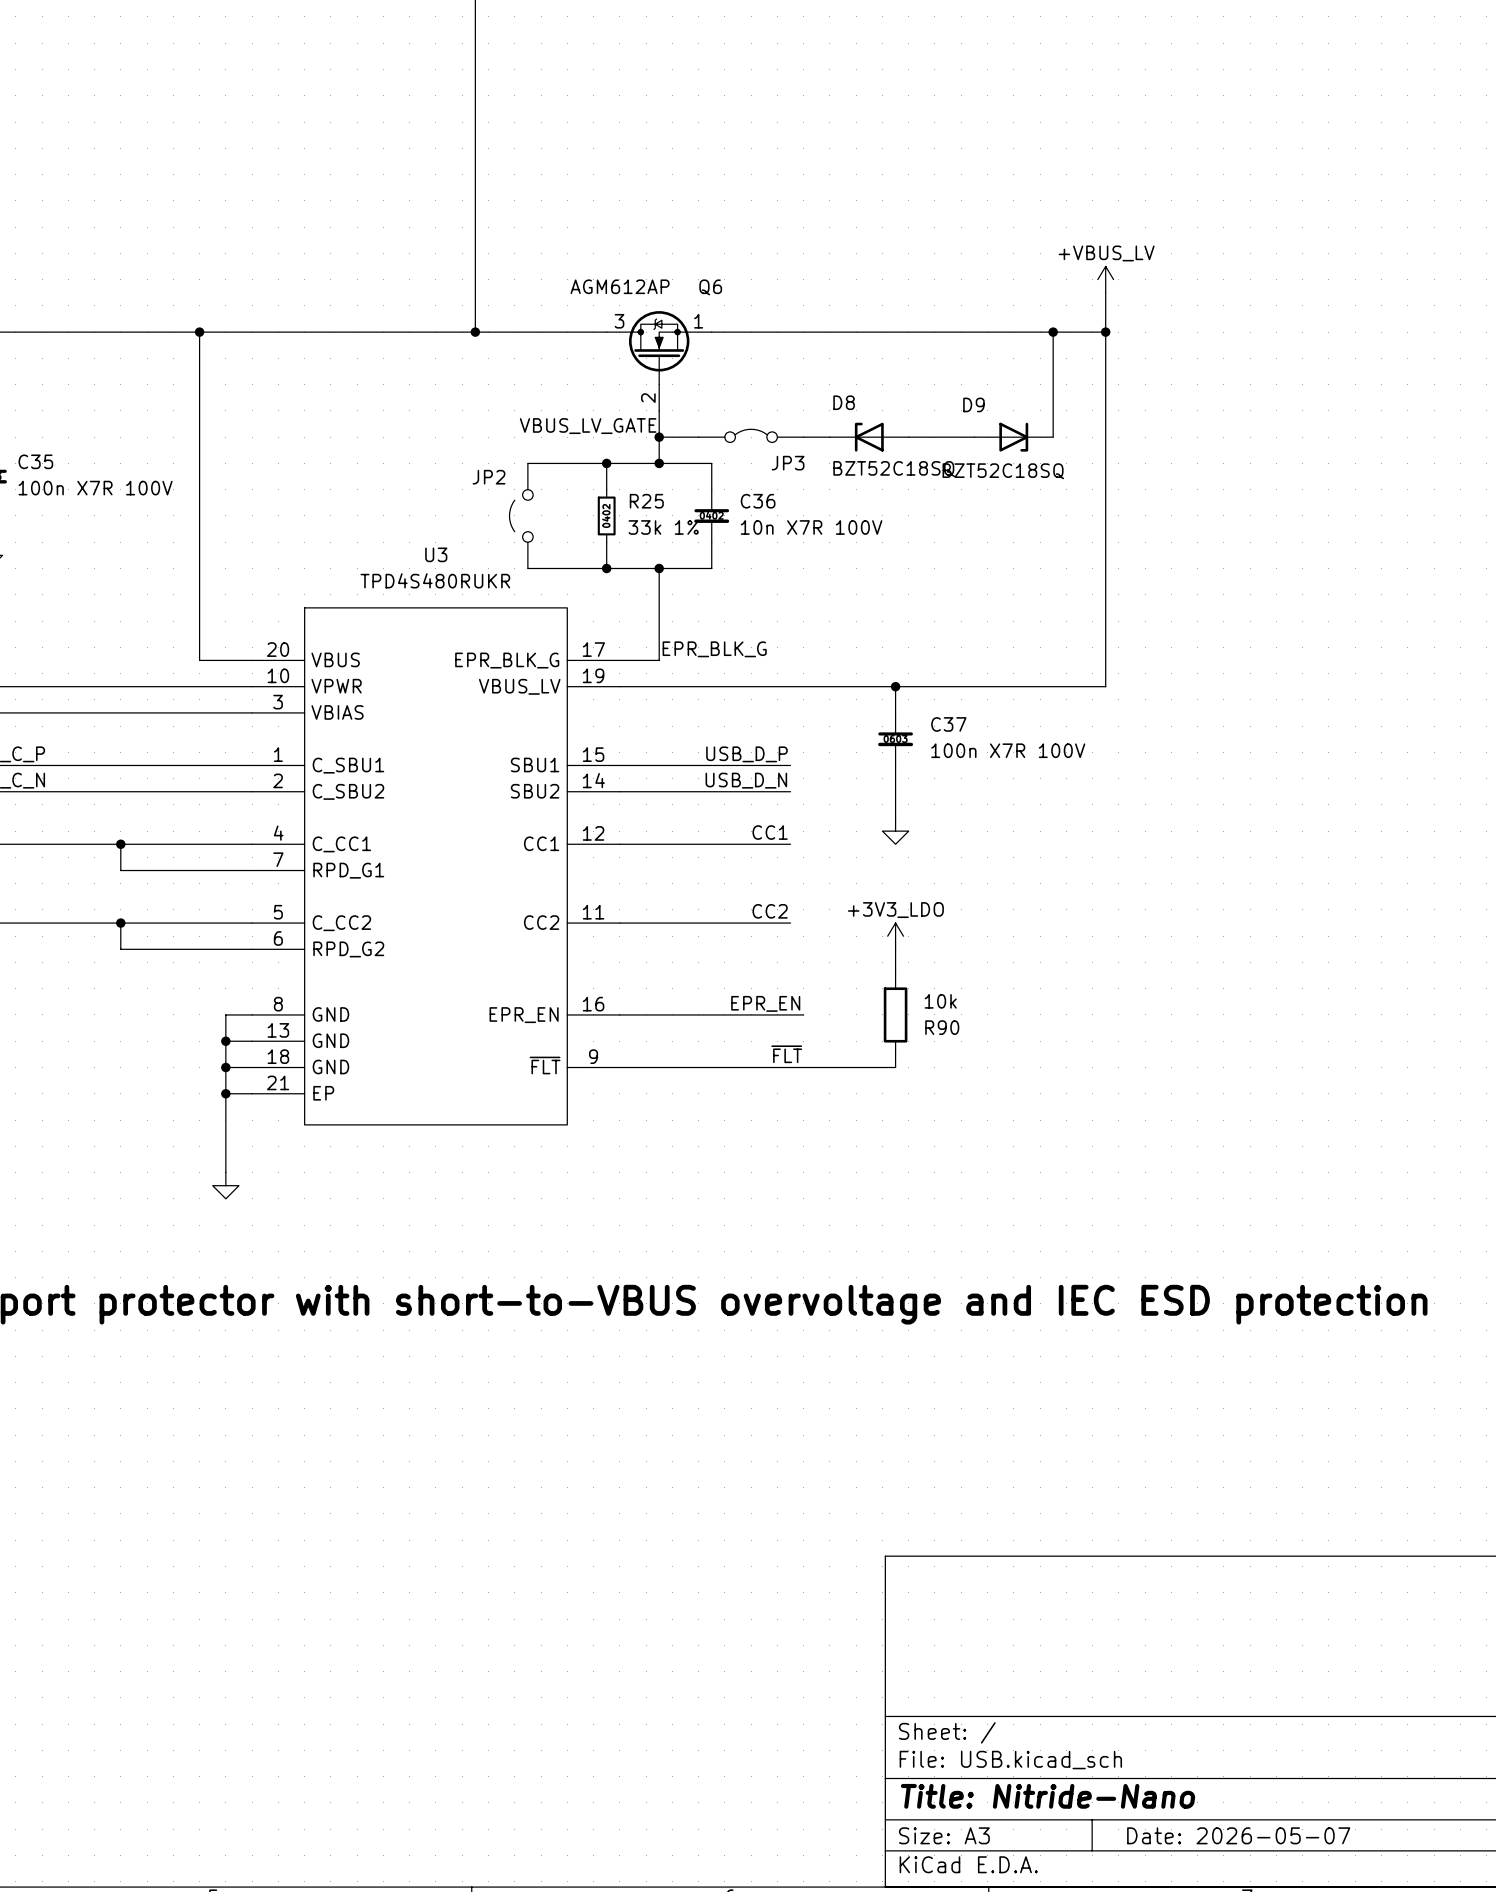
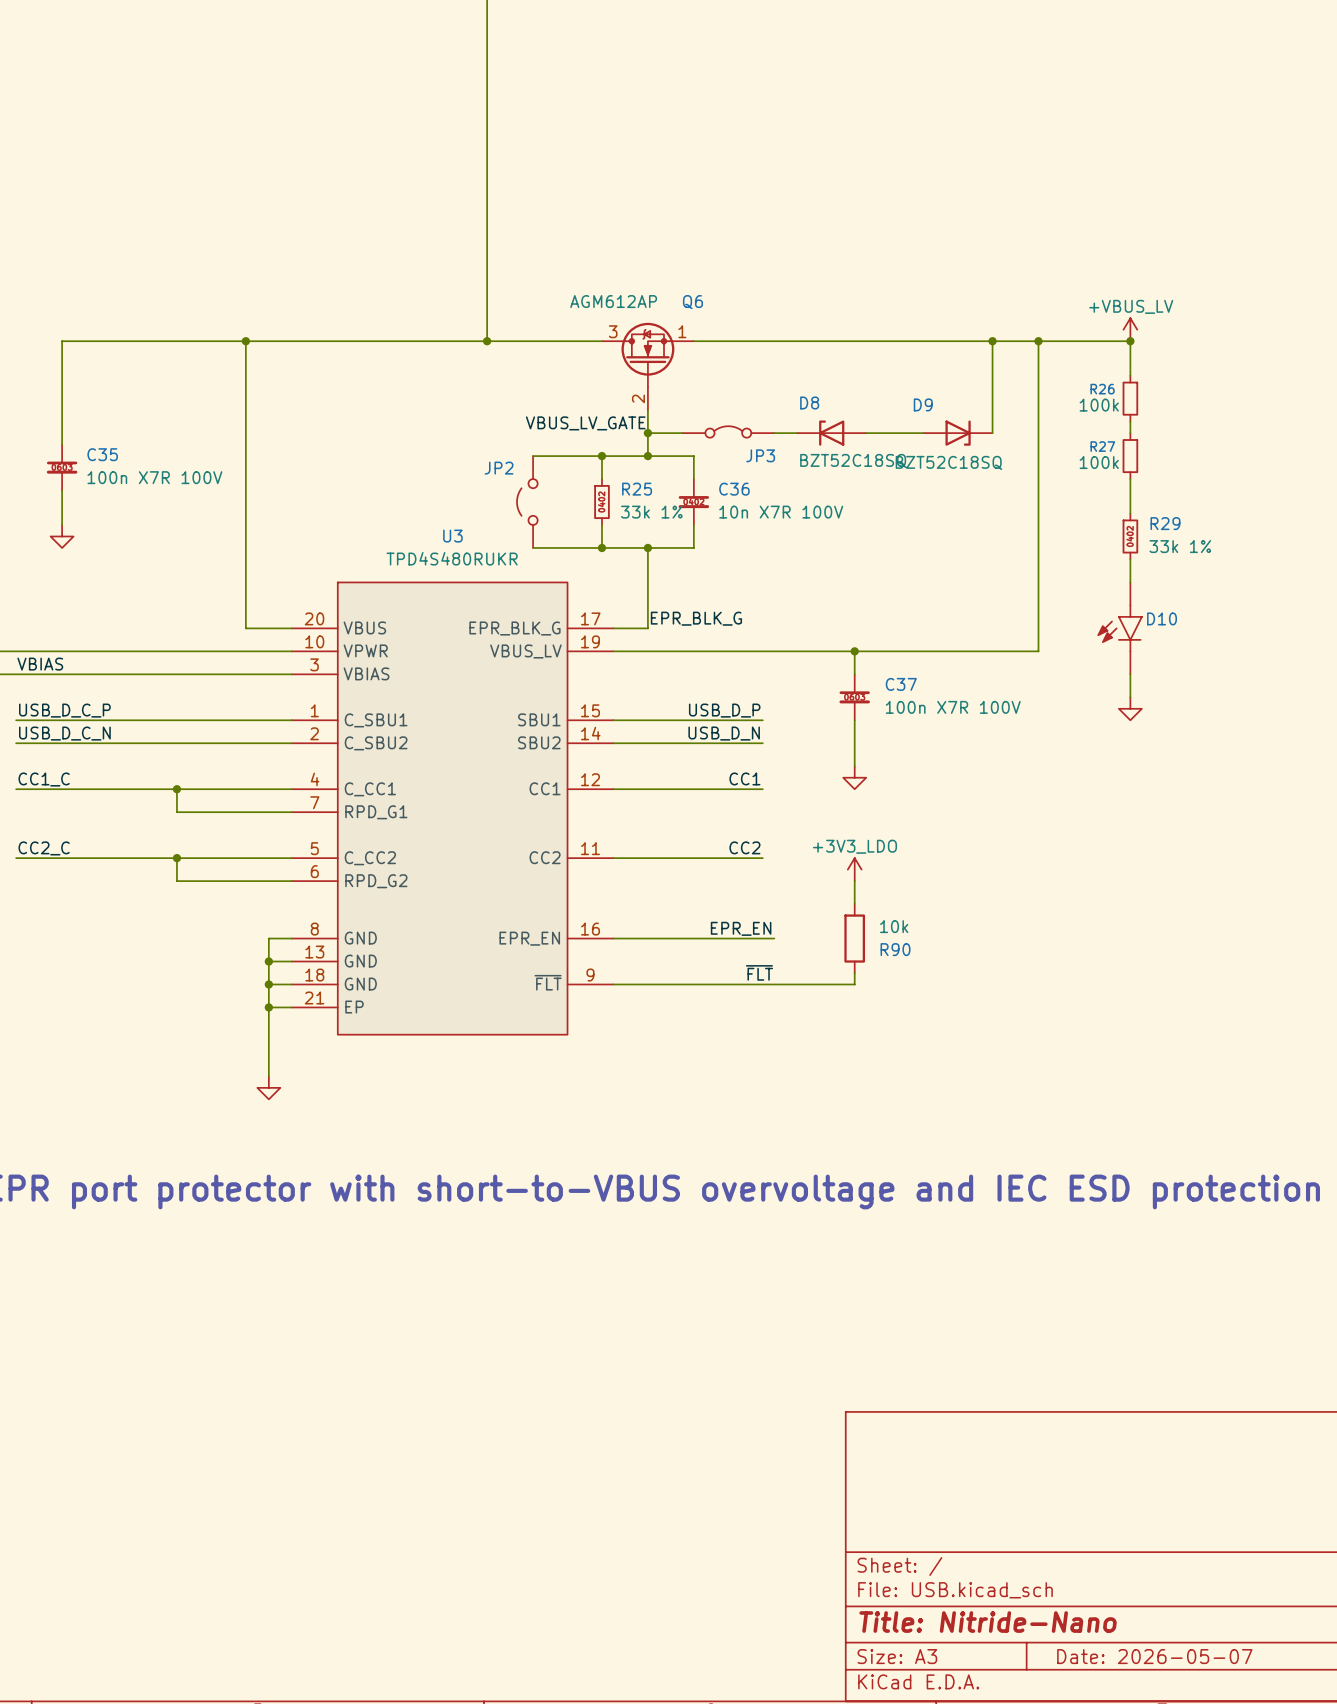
power symbol position: +VBUS_LV (1105, 279) -> +VBUS_LV (1130, 329)
wire: (1105, 292) (1105, 332) -> (1130, 375) (1130, 341) (1038, 341)
junction: none -> (1130, 341)
R26: none -> 100k (1130, 398)
wire: none -> (1130, 421) (1130, 433)
R27: none -> 100k (1130, 456)
wire: none -> (1130, 479) (1130, 513)
R29: none -> 33k 1% (1130, 536)
wire: none -> (1130, 559) (1130, 582)
D10: none -> (1120, 628)
wire: none -> (1130, 674) (1130, 697)
power symbol: none -> (1130, 708)

